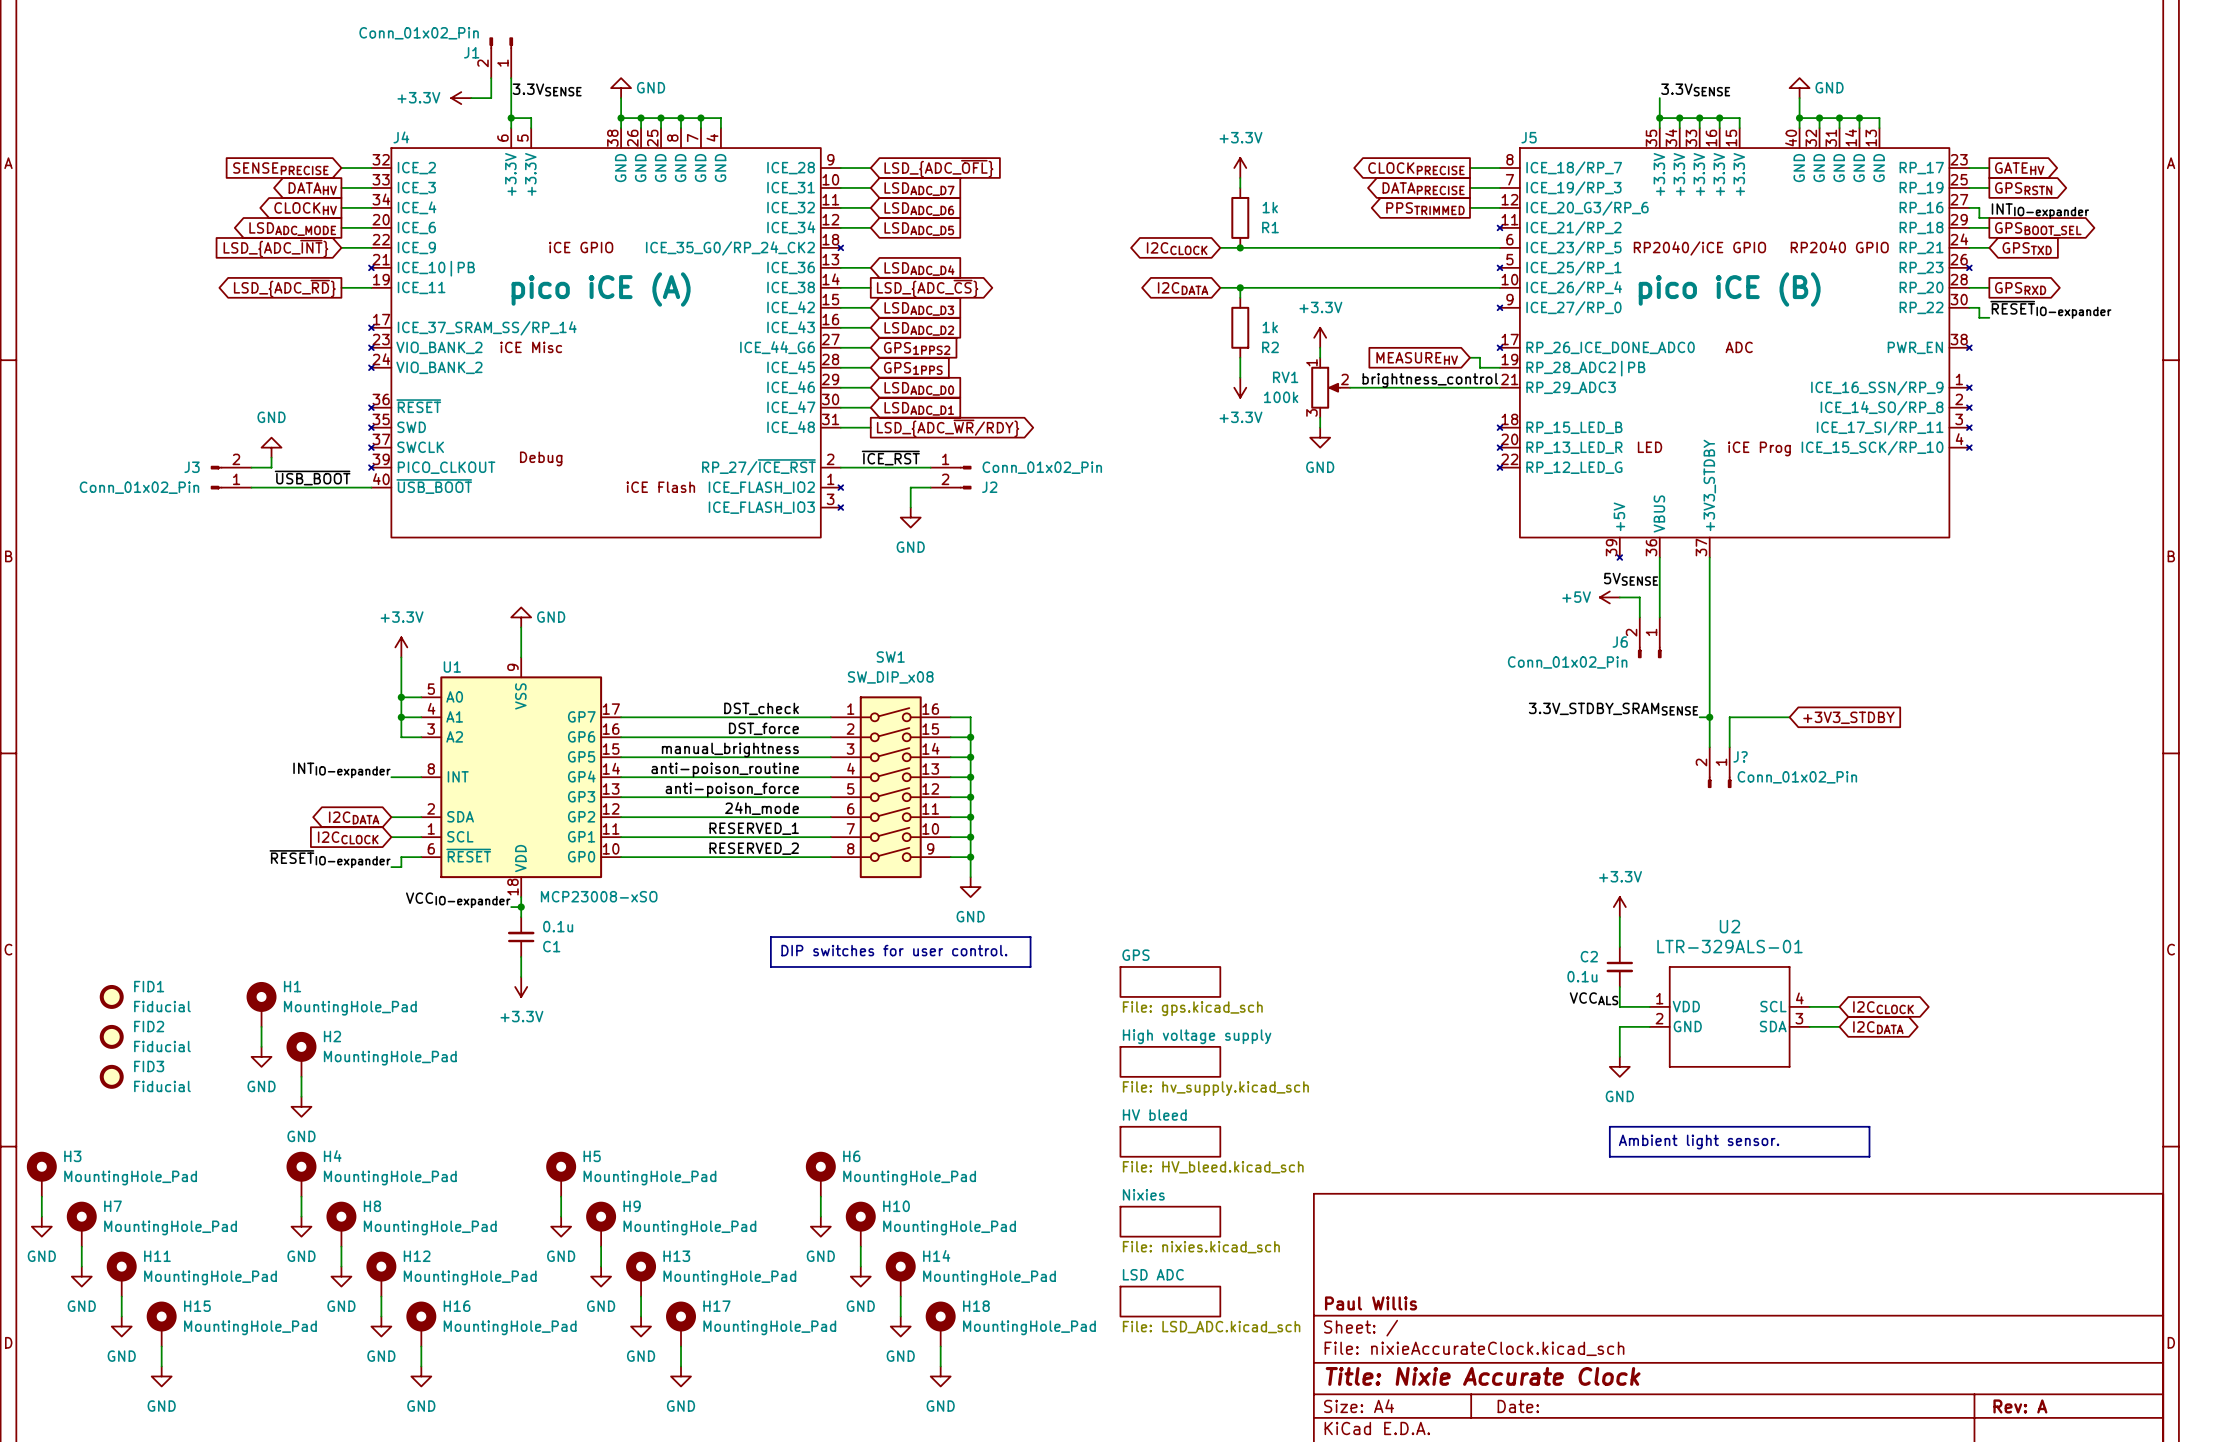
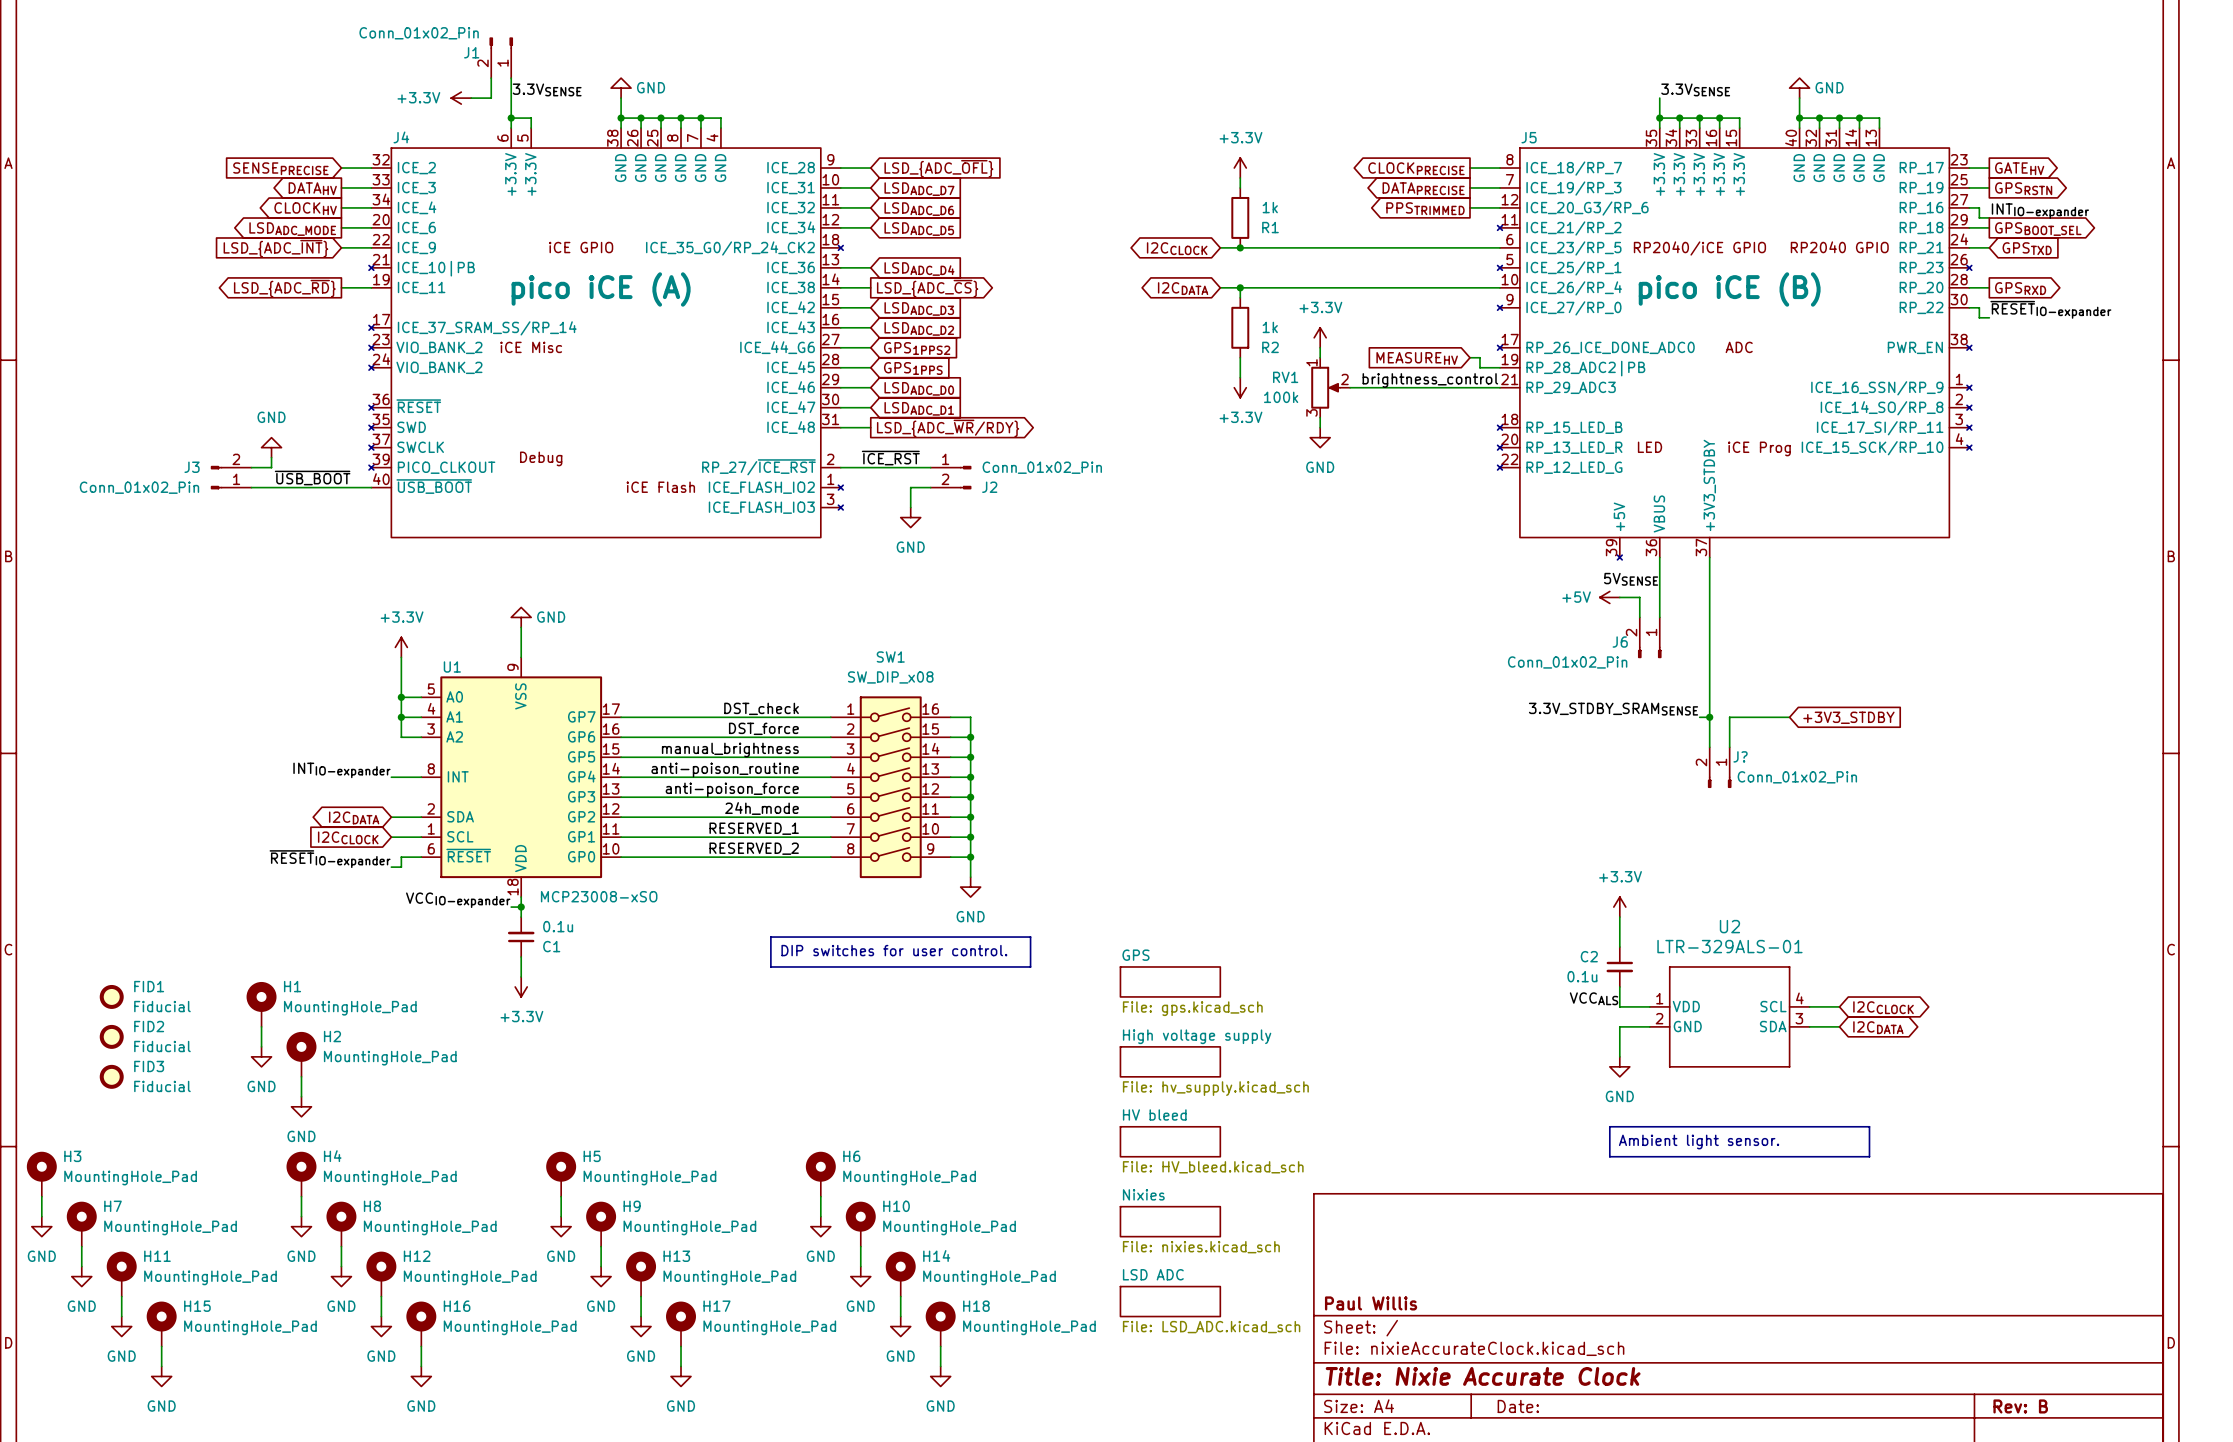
title block: Rev: A (2020, 1406) -> Rev: B (2020, 1406)

